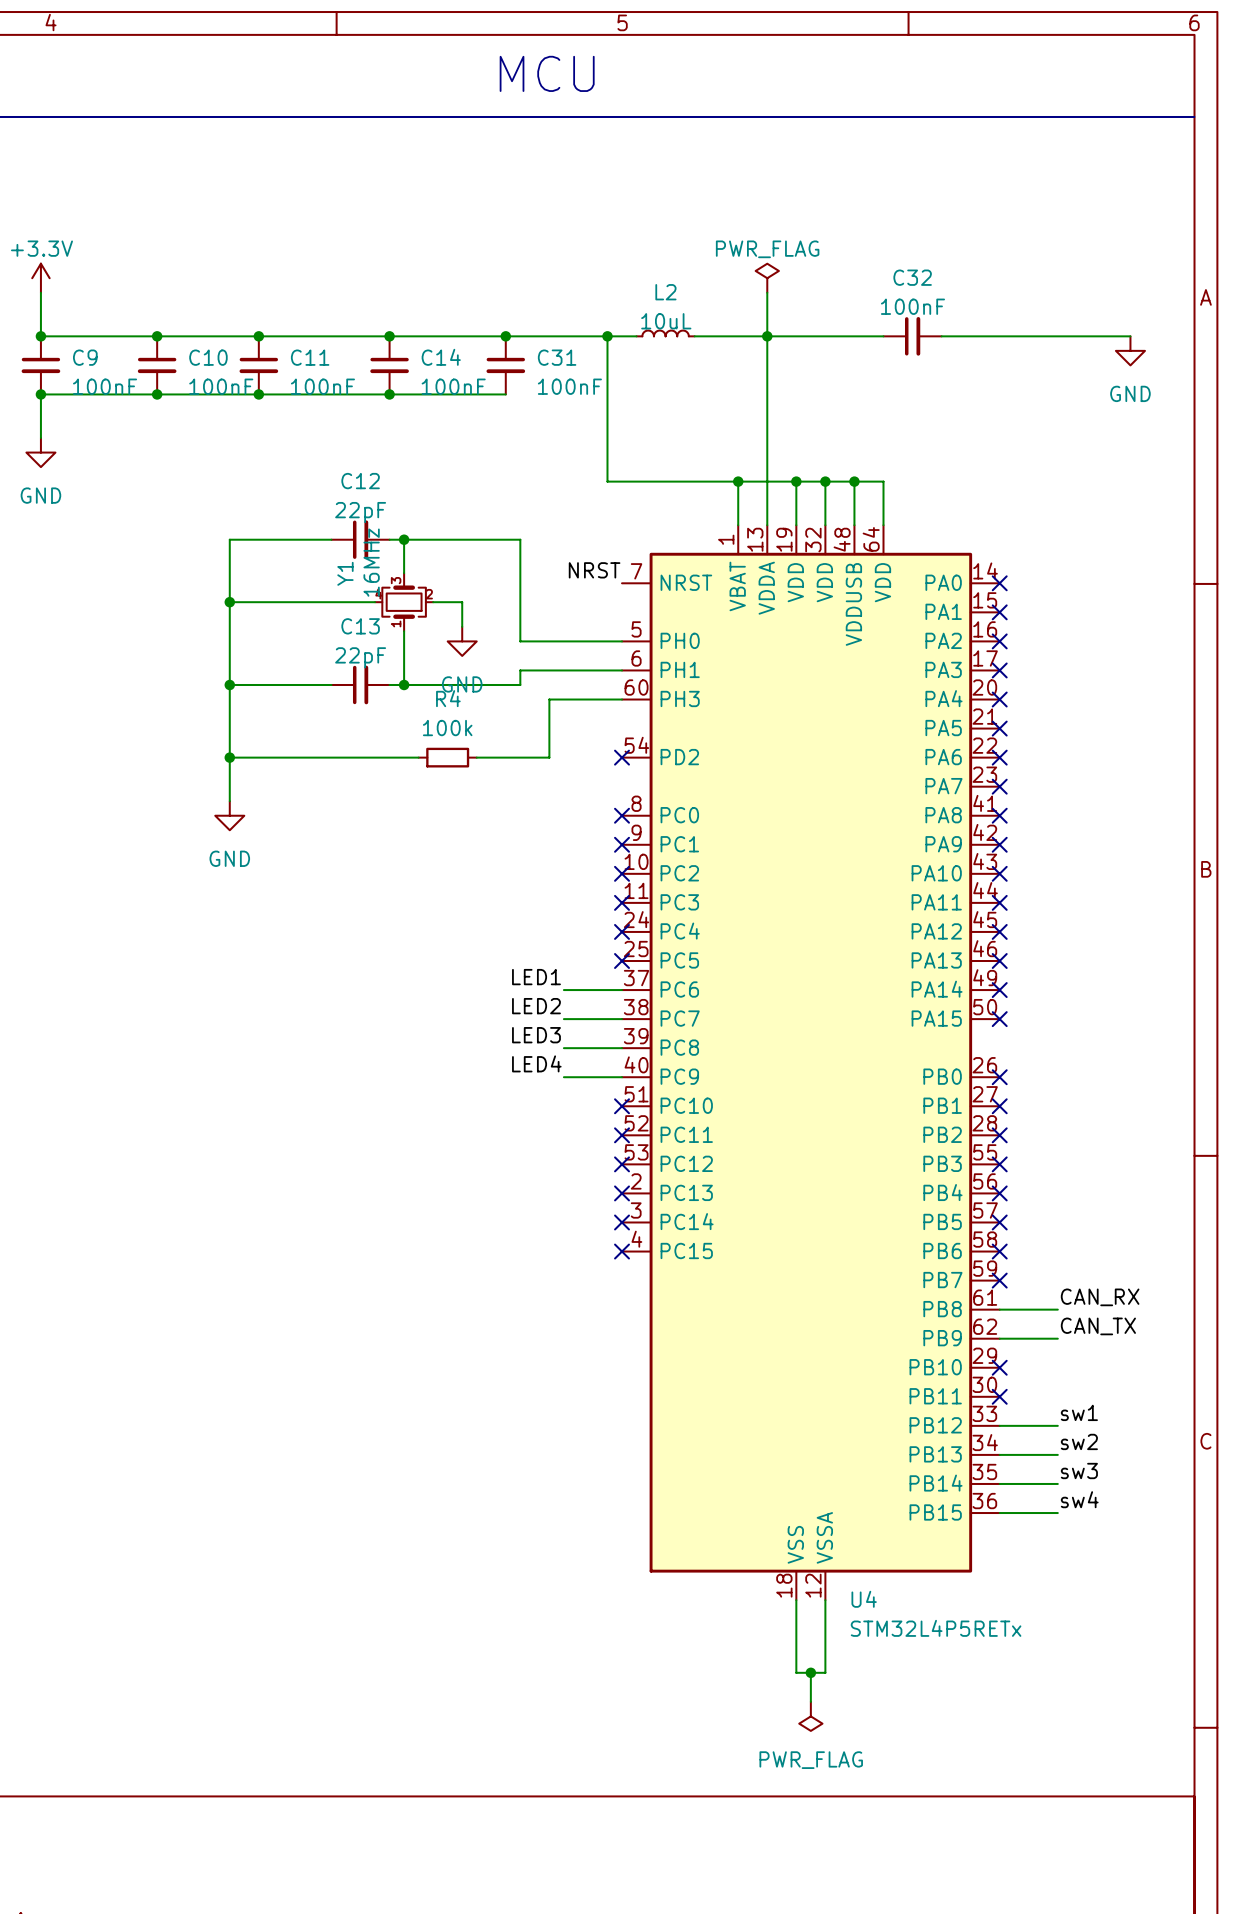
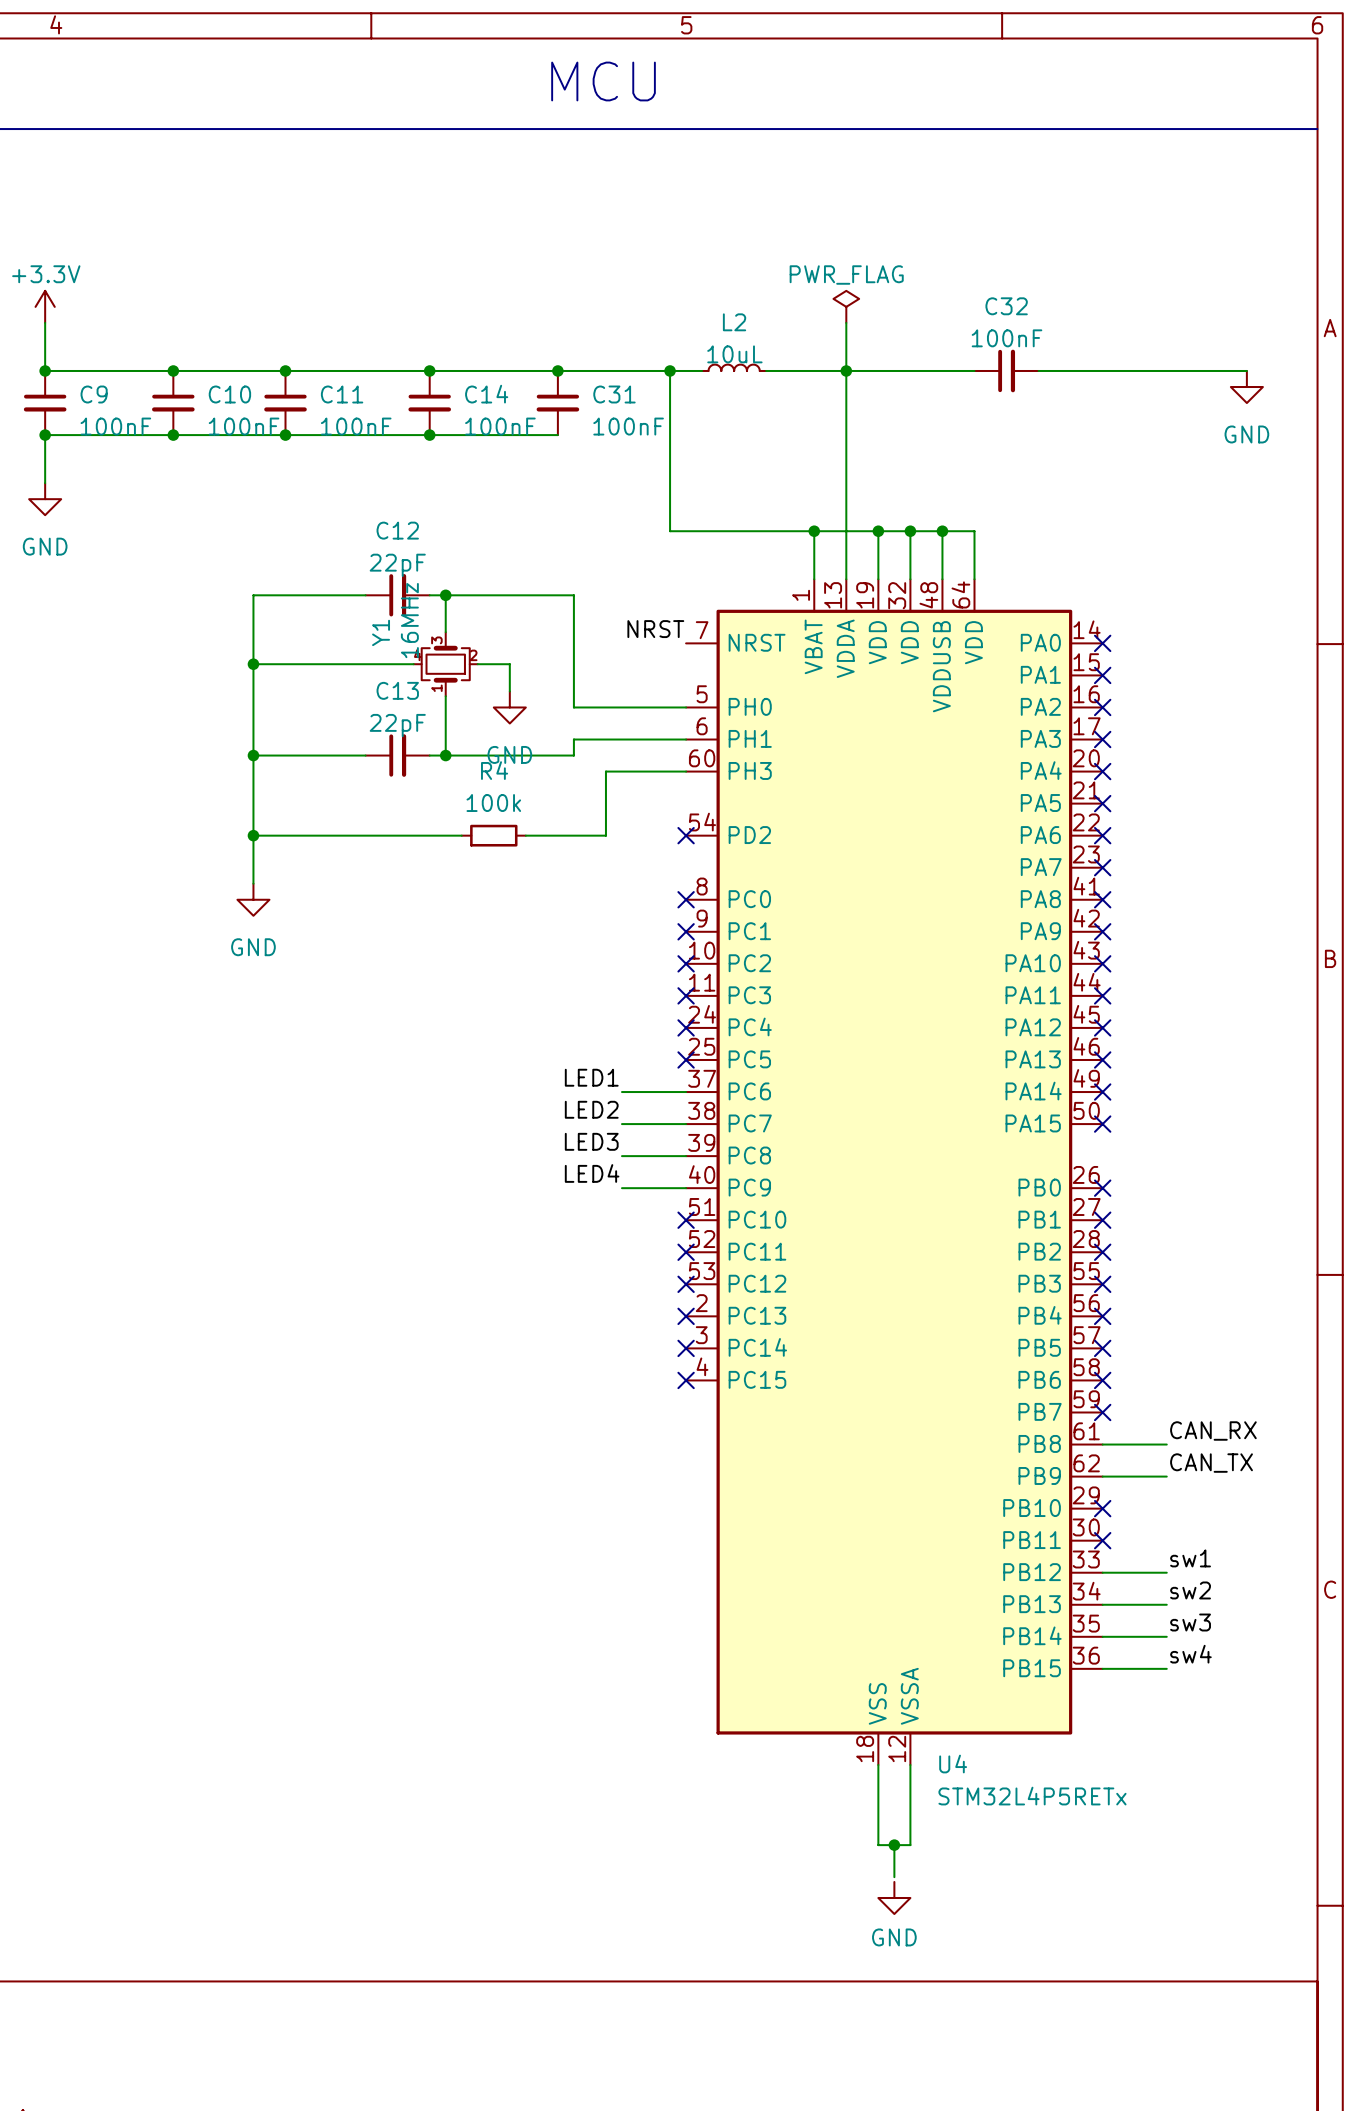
power symbol: PWR_FLAG (810, 1716) -> GND (894, 1897)

